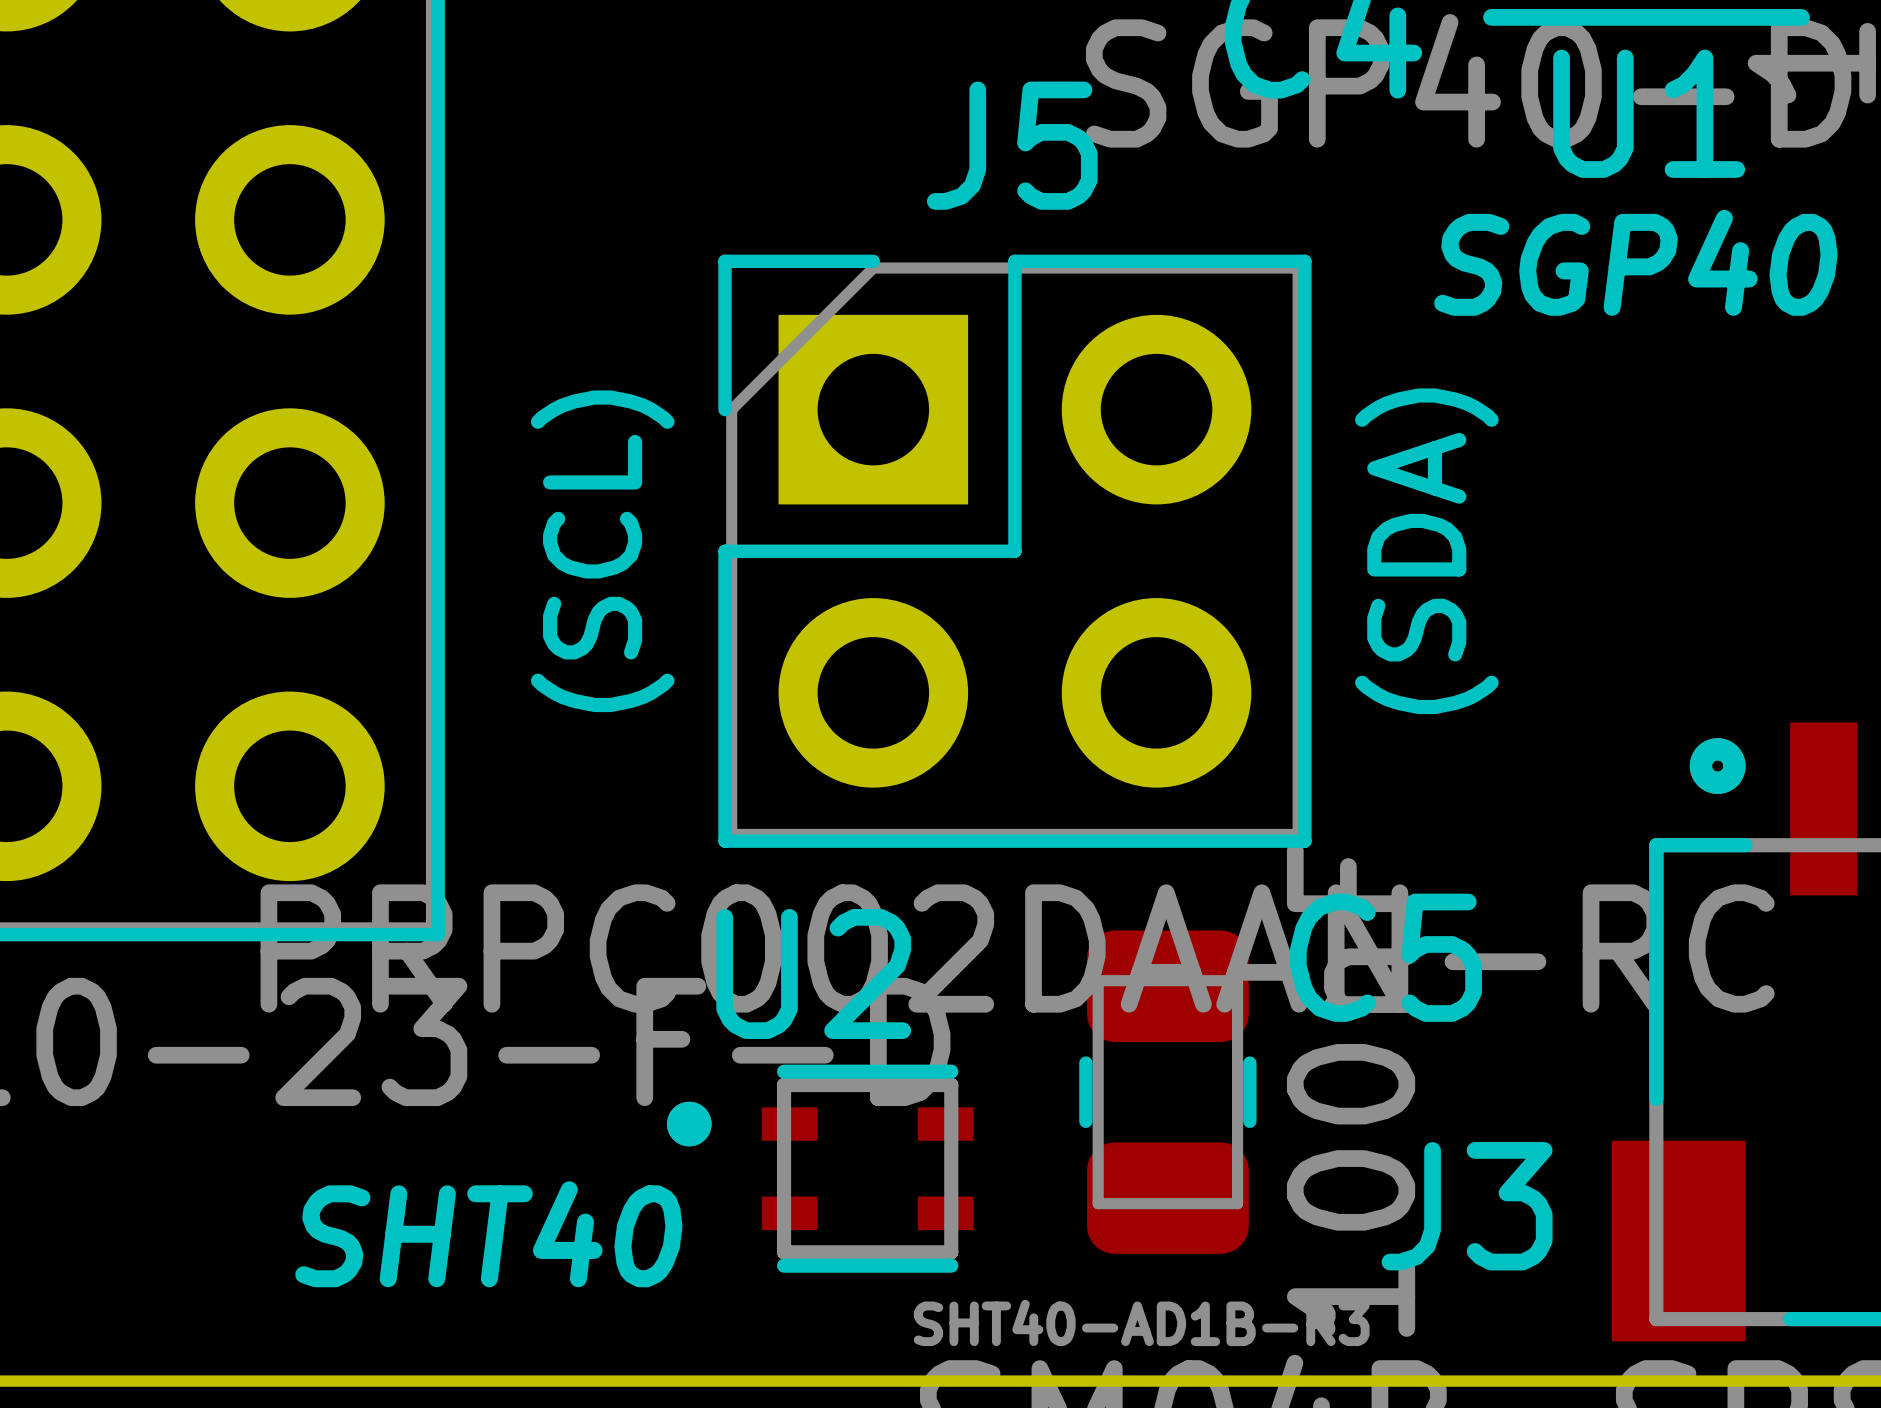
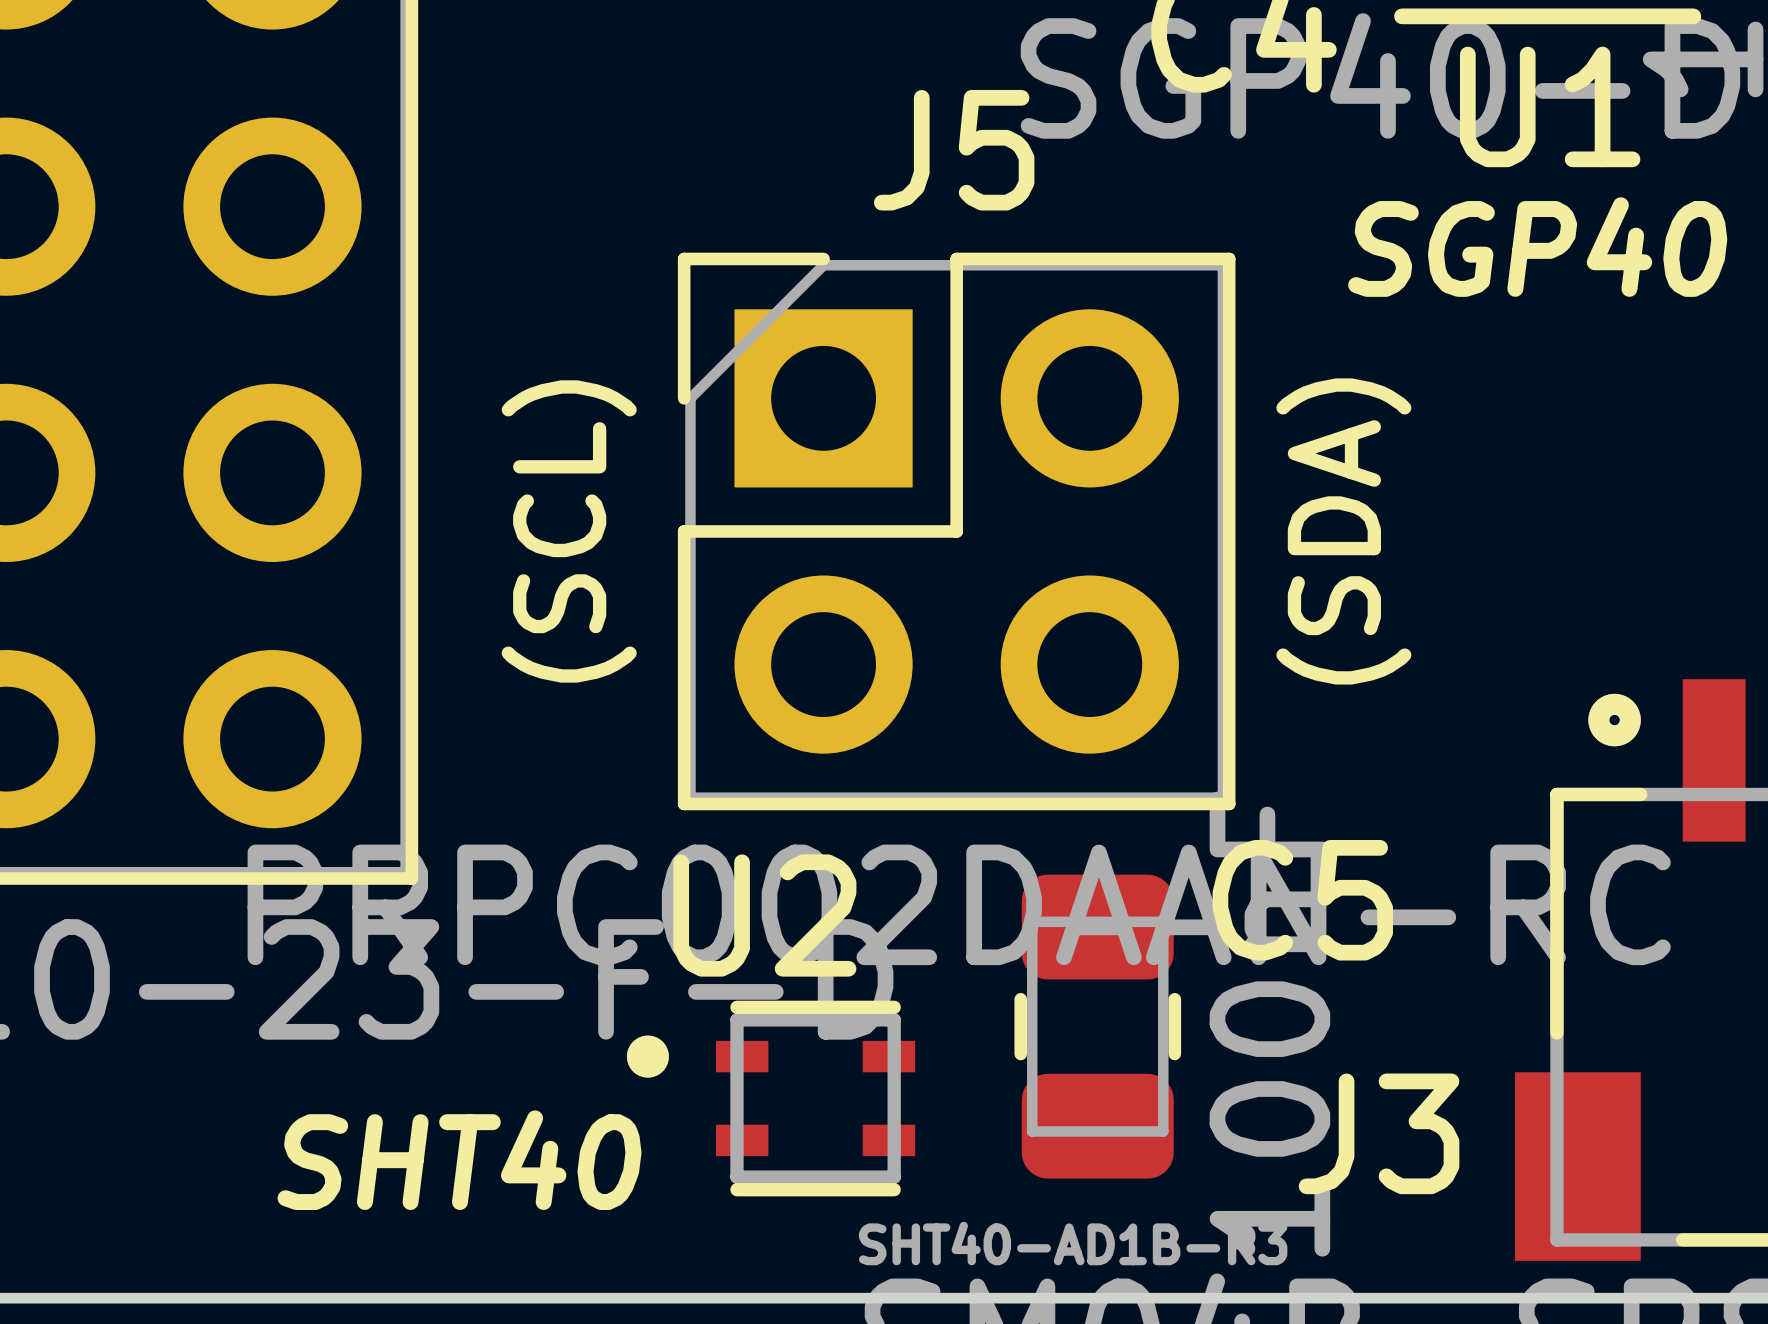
text position: (SCL) (602, 551) -> (SCL) (569, 531)
J5 position: (1014, 551) -> (956, 531)
text position: (SDA) (1426, 551) -> (SDA) (1343, 531)

